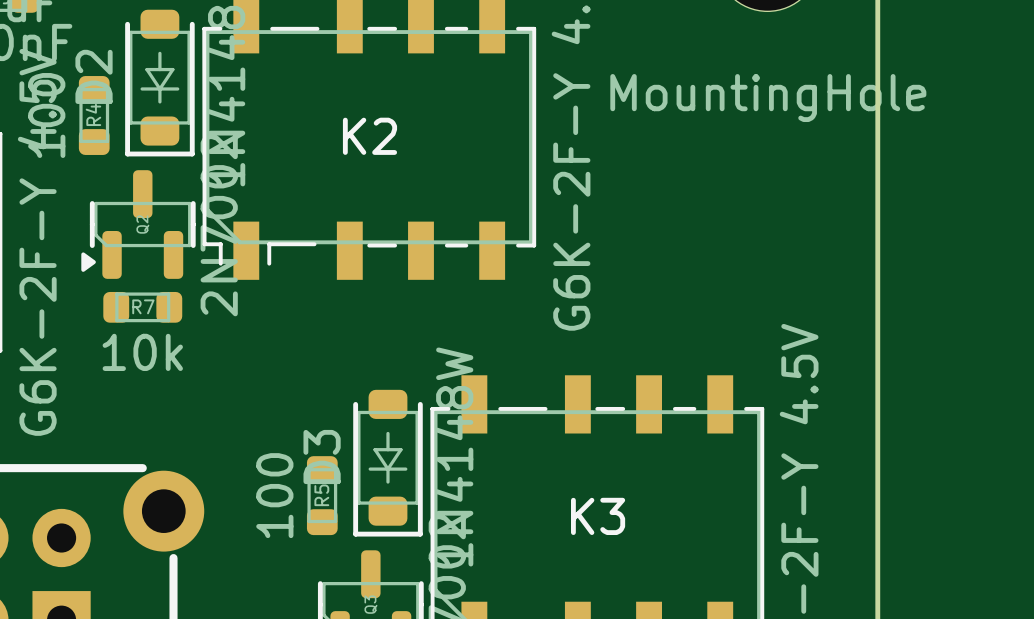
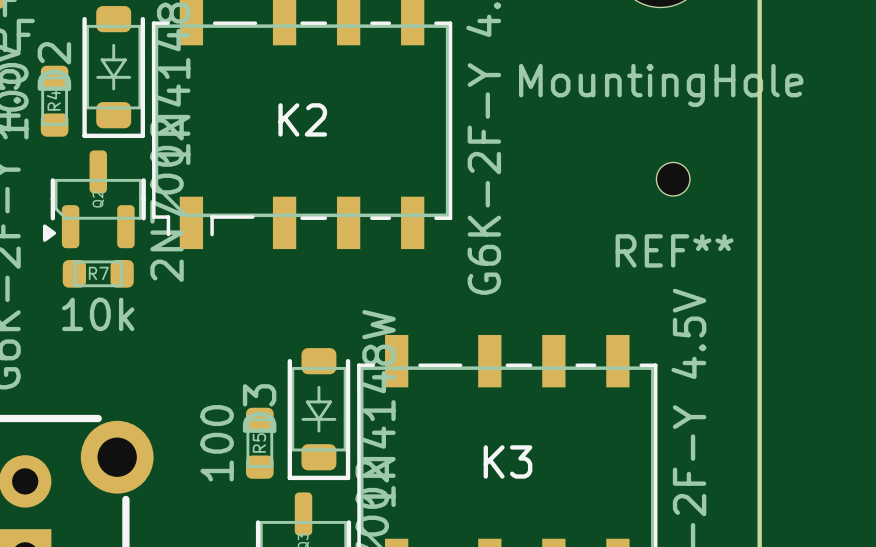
REF**: none -> (673, 179)

